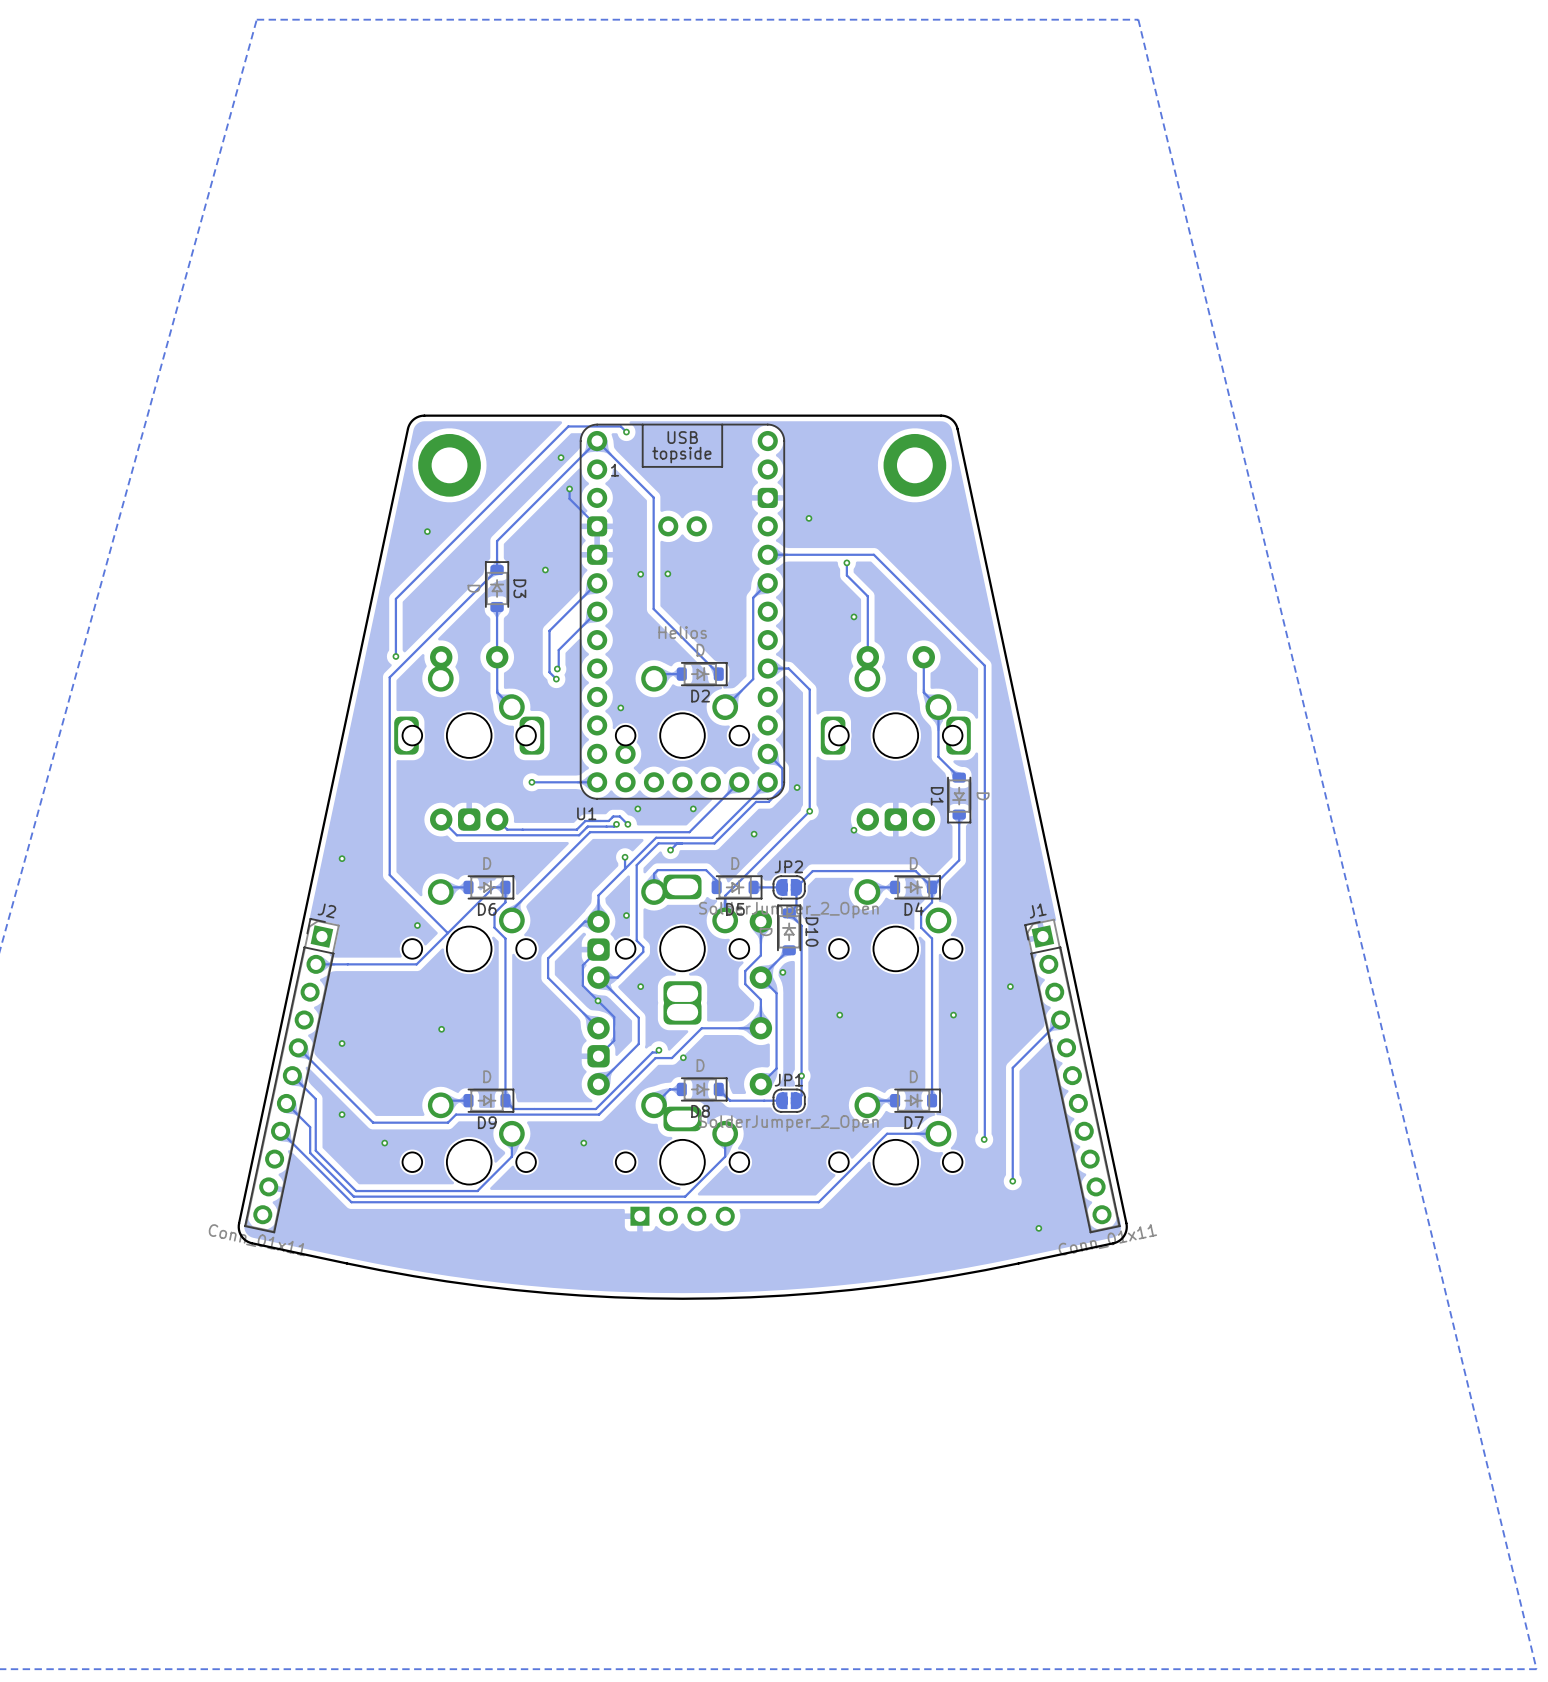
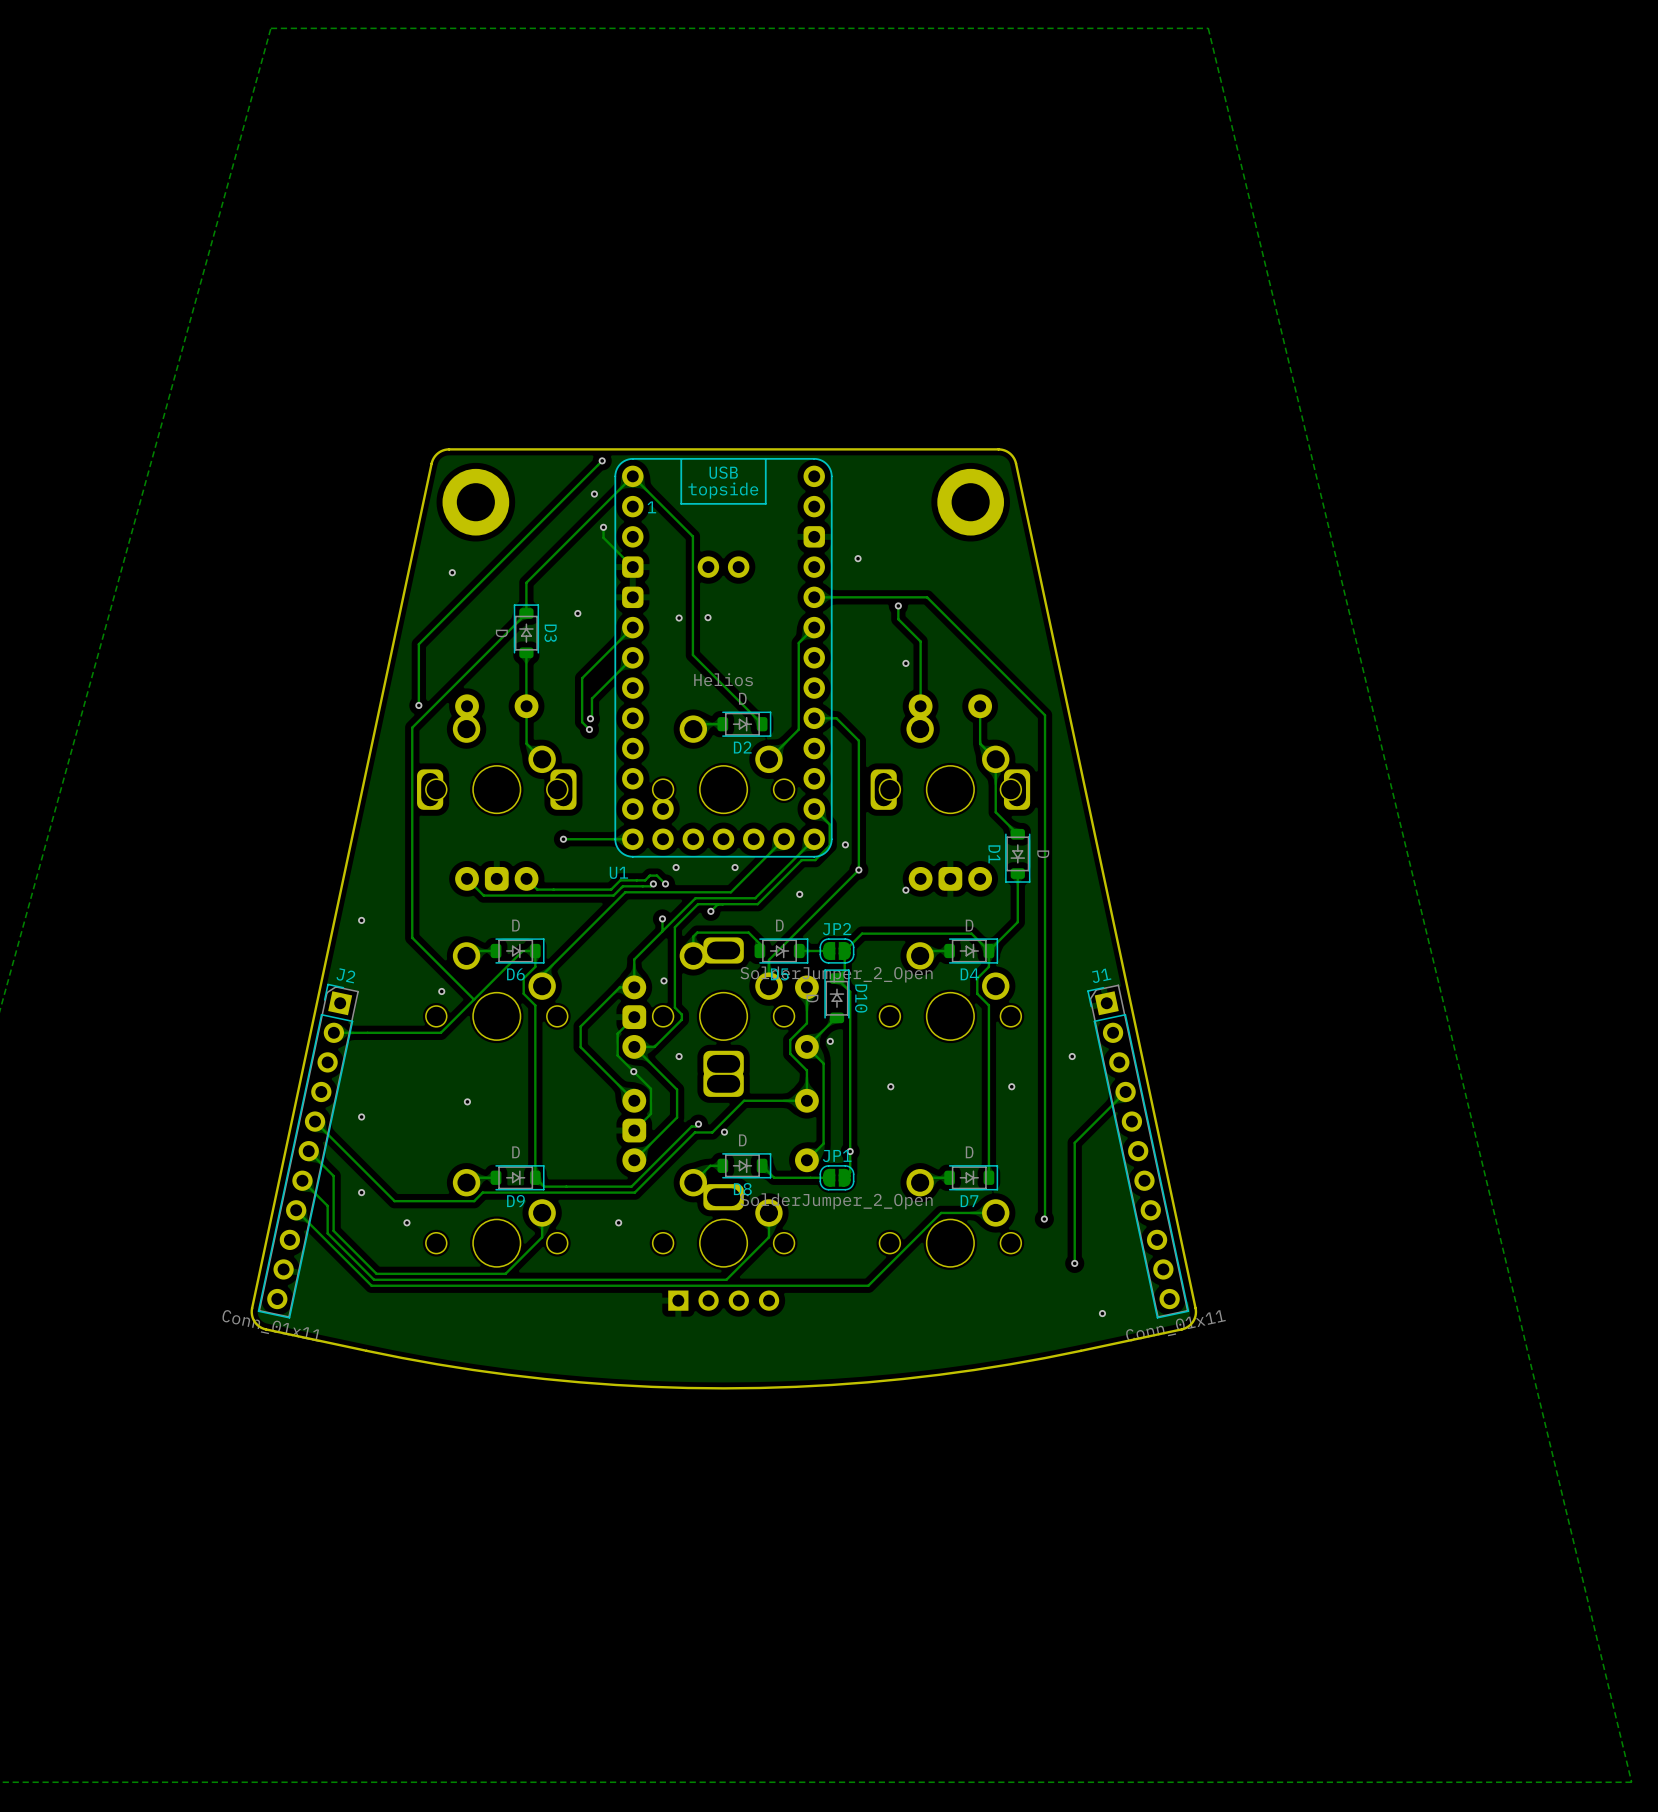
track: (568, 426) (620, 426) (626, 432) -> none
via position: (626, 432) -> (602, 460)
via: (620, 707) -> none

